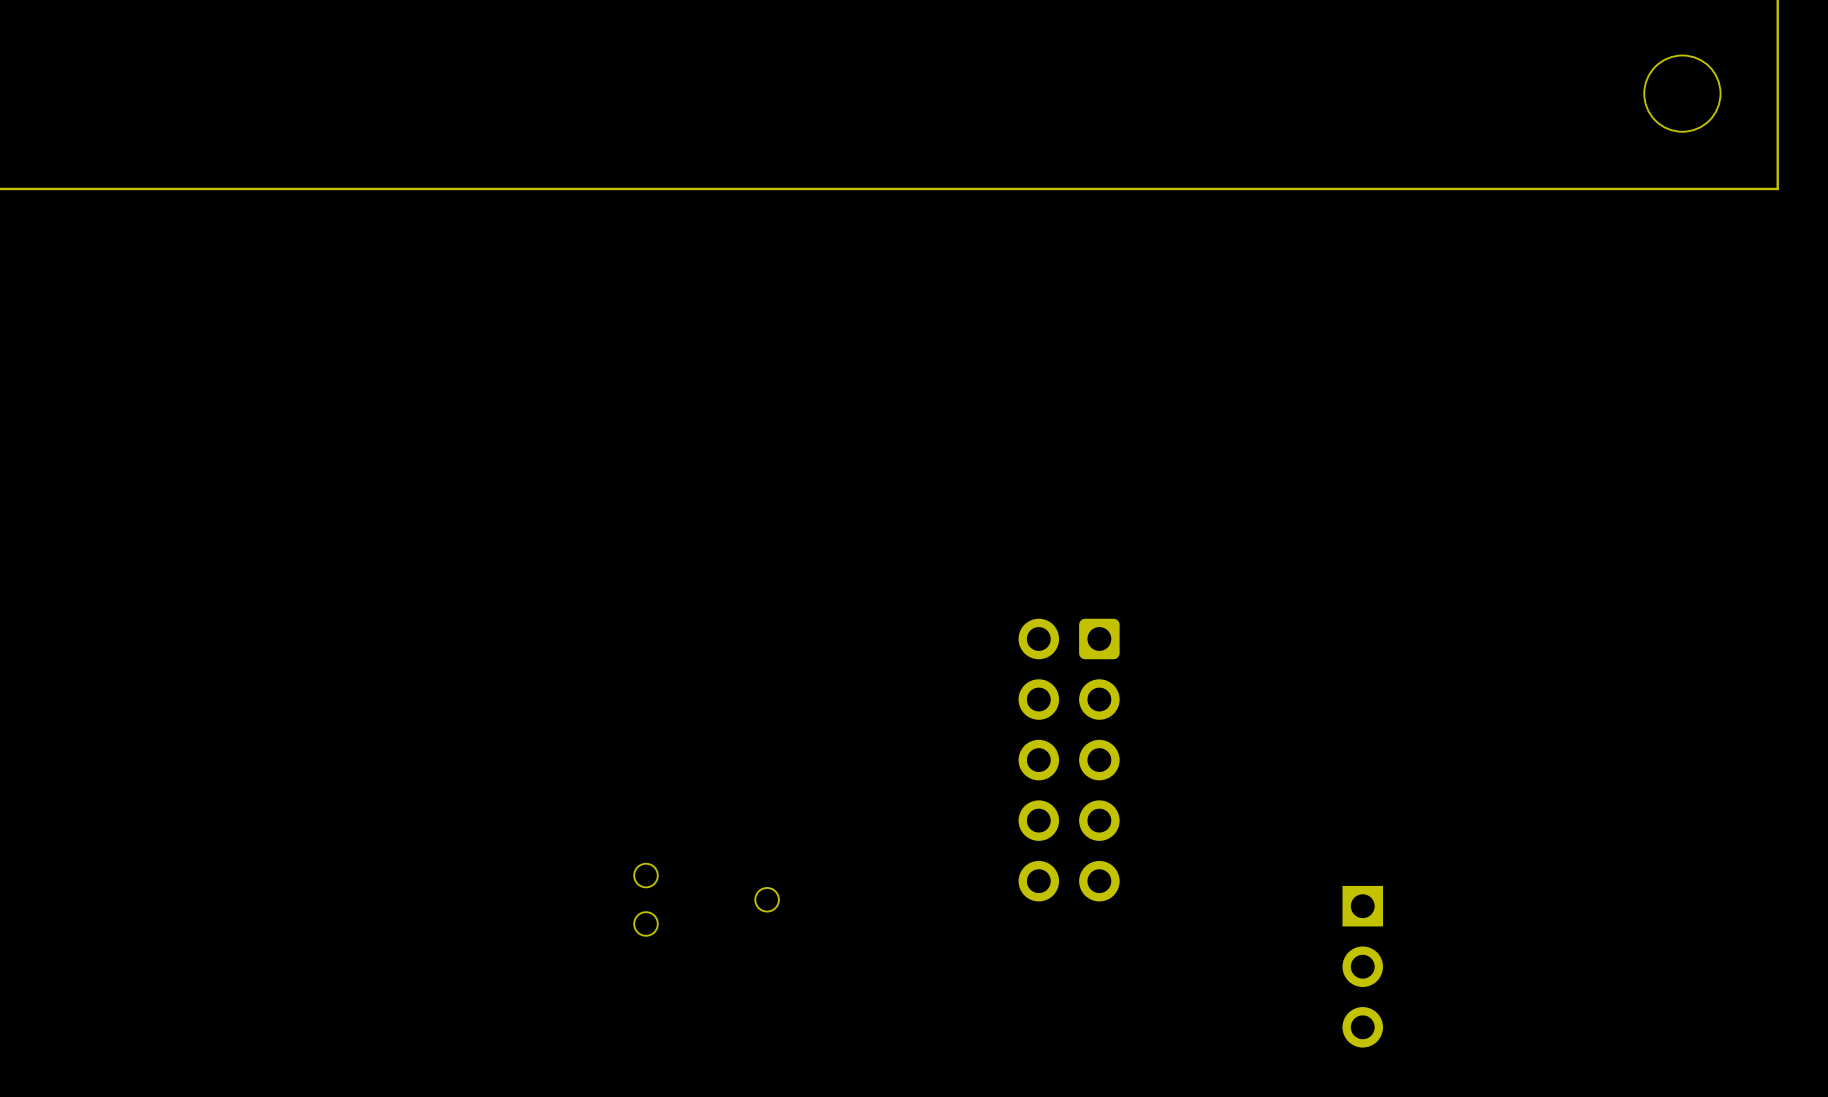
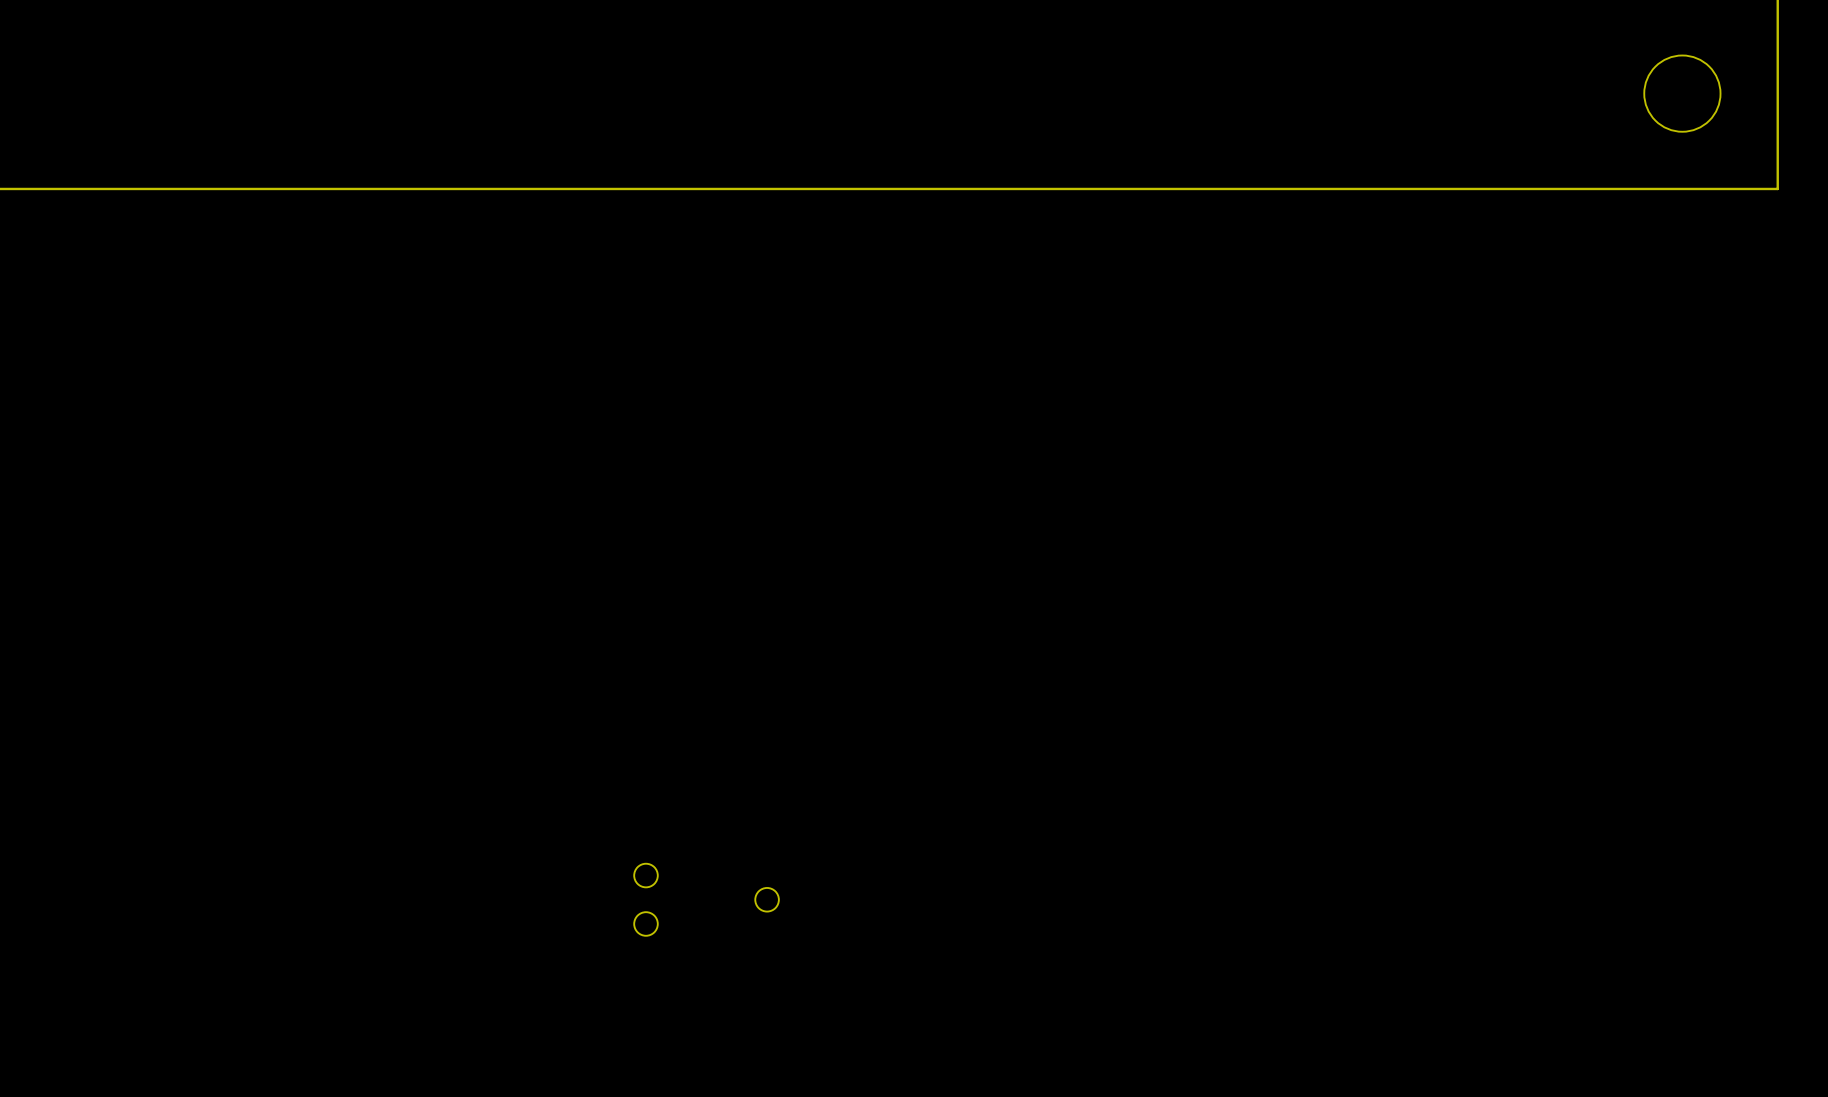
part: (1069, 760) -> none
part: (1362, 966) -> none

